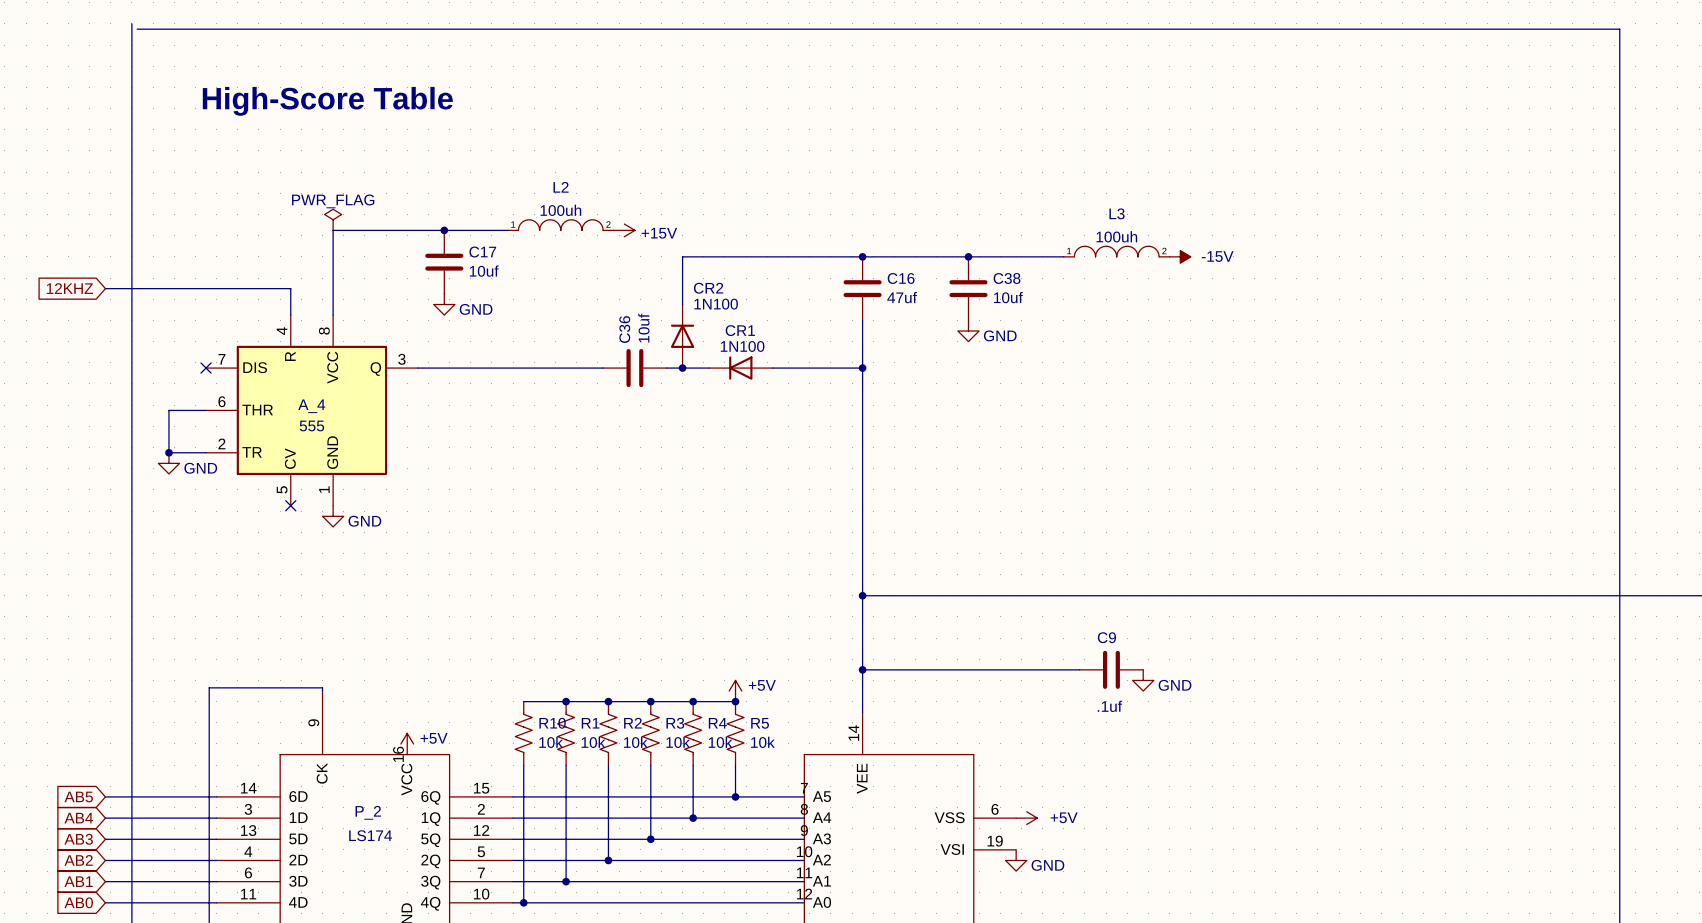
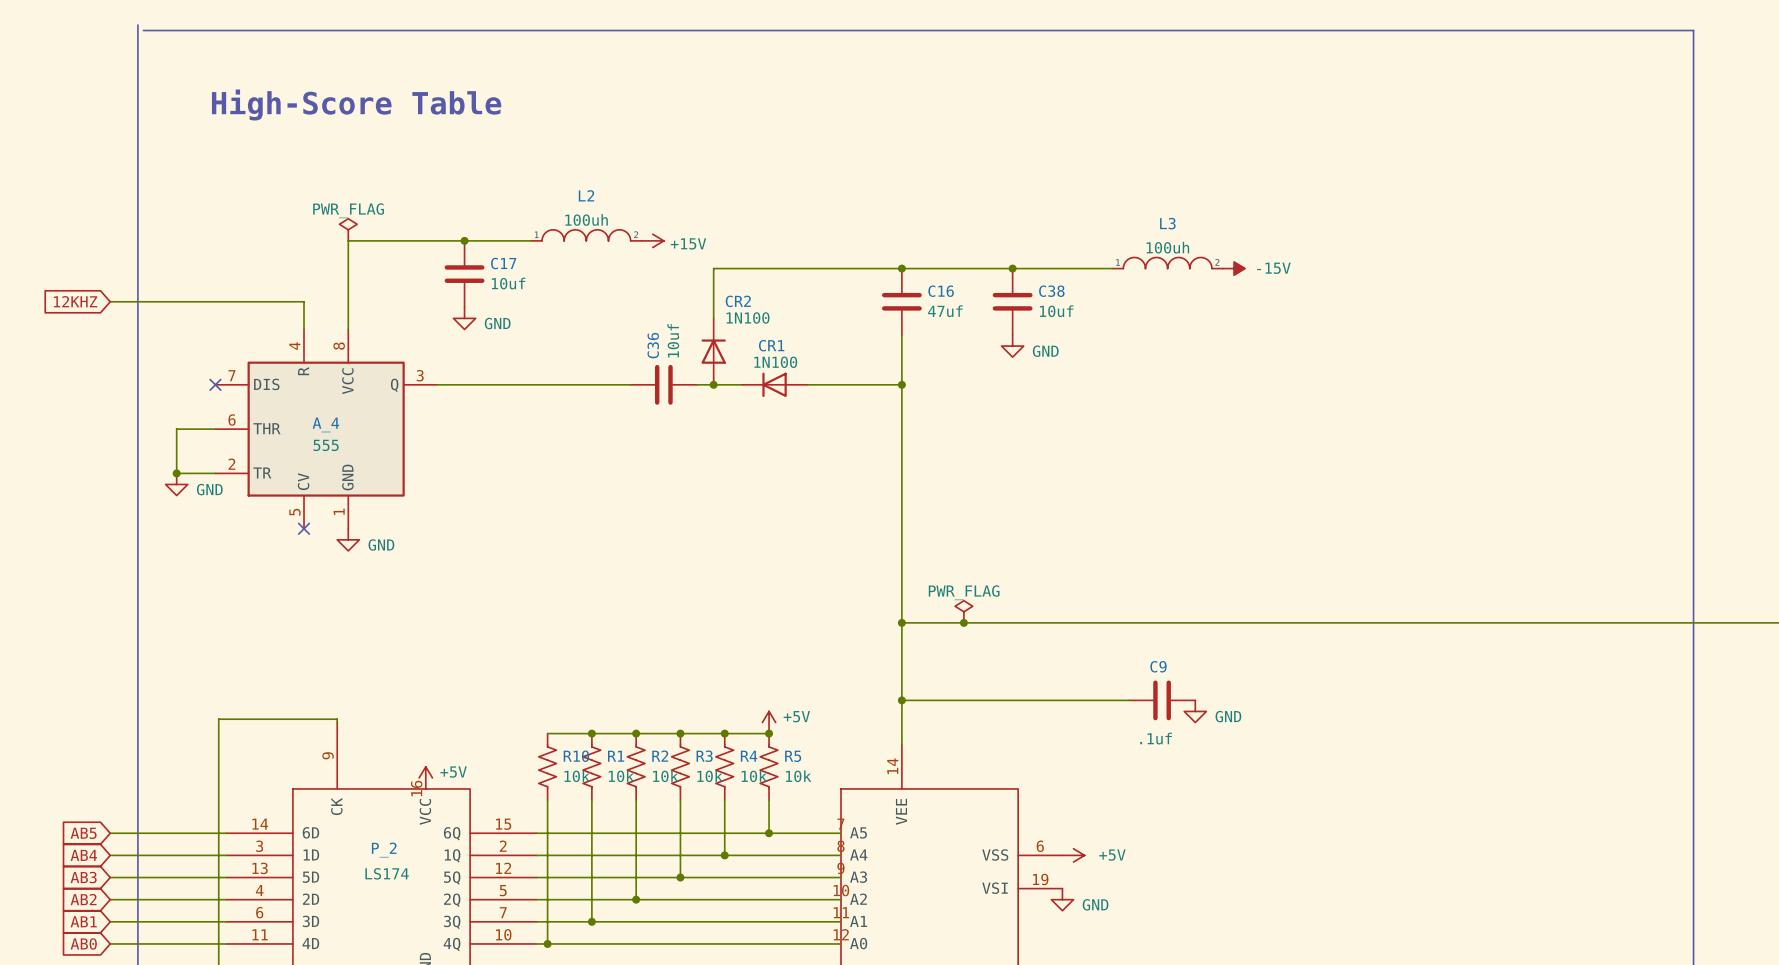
power symbol: none -> PWR_FLAG (963, 611)
junction: none -> (963, 622)

